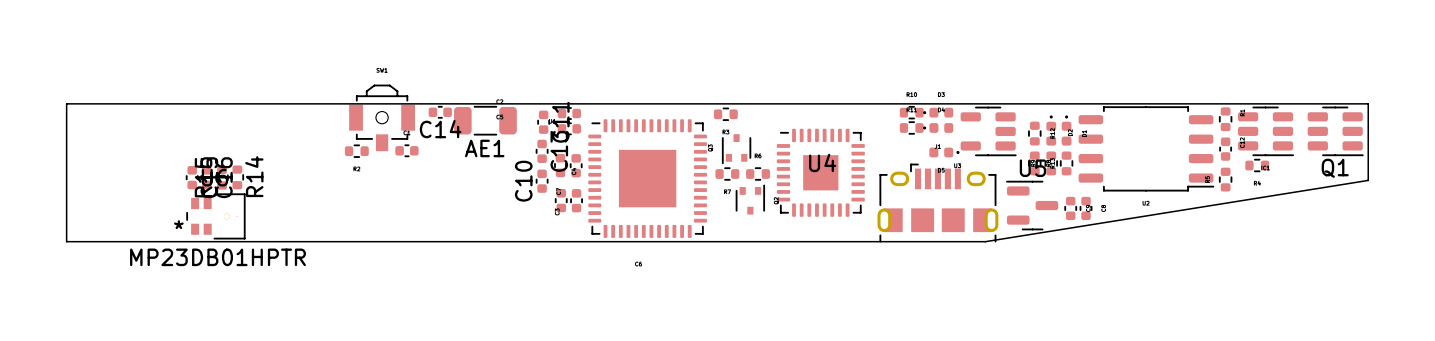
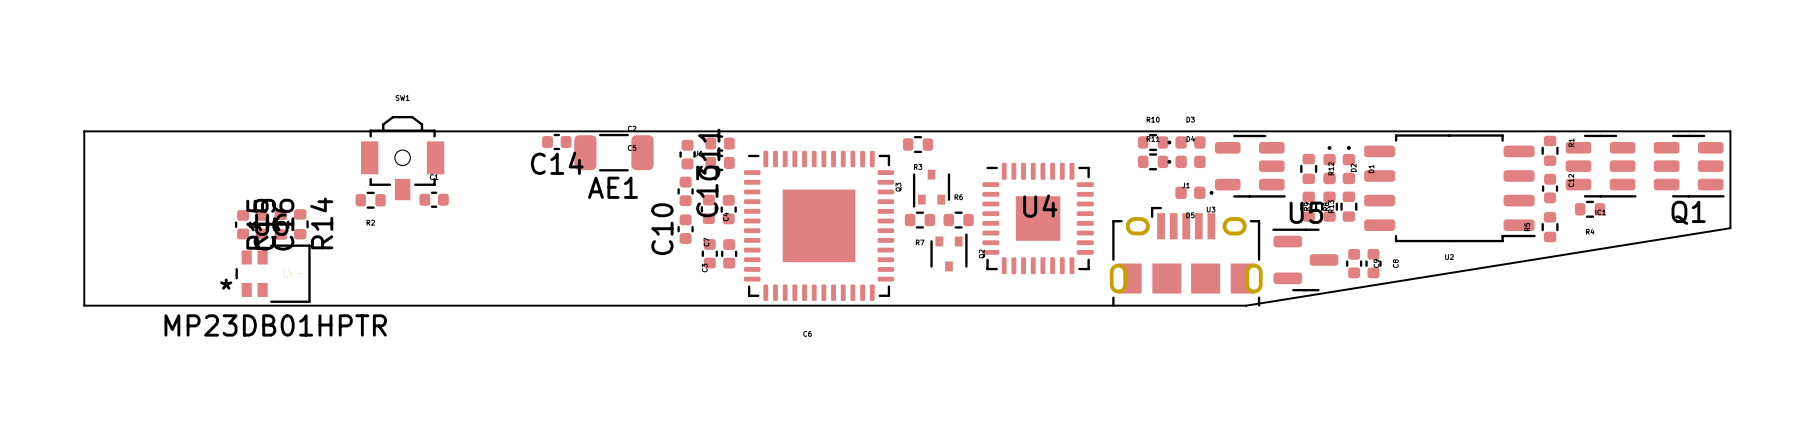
part position: (382, 117) -> (402, 158)
part position: (406, 150) -> (434, 199)
part position: (356, 151) -> (370, 200)

